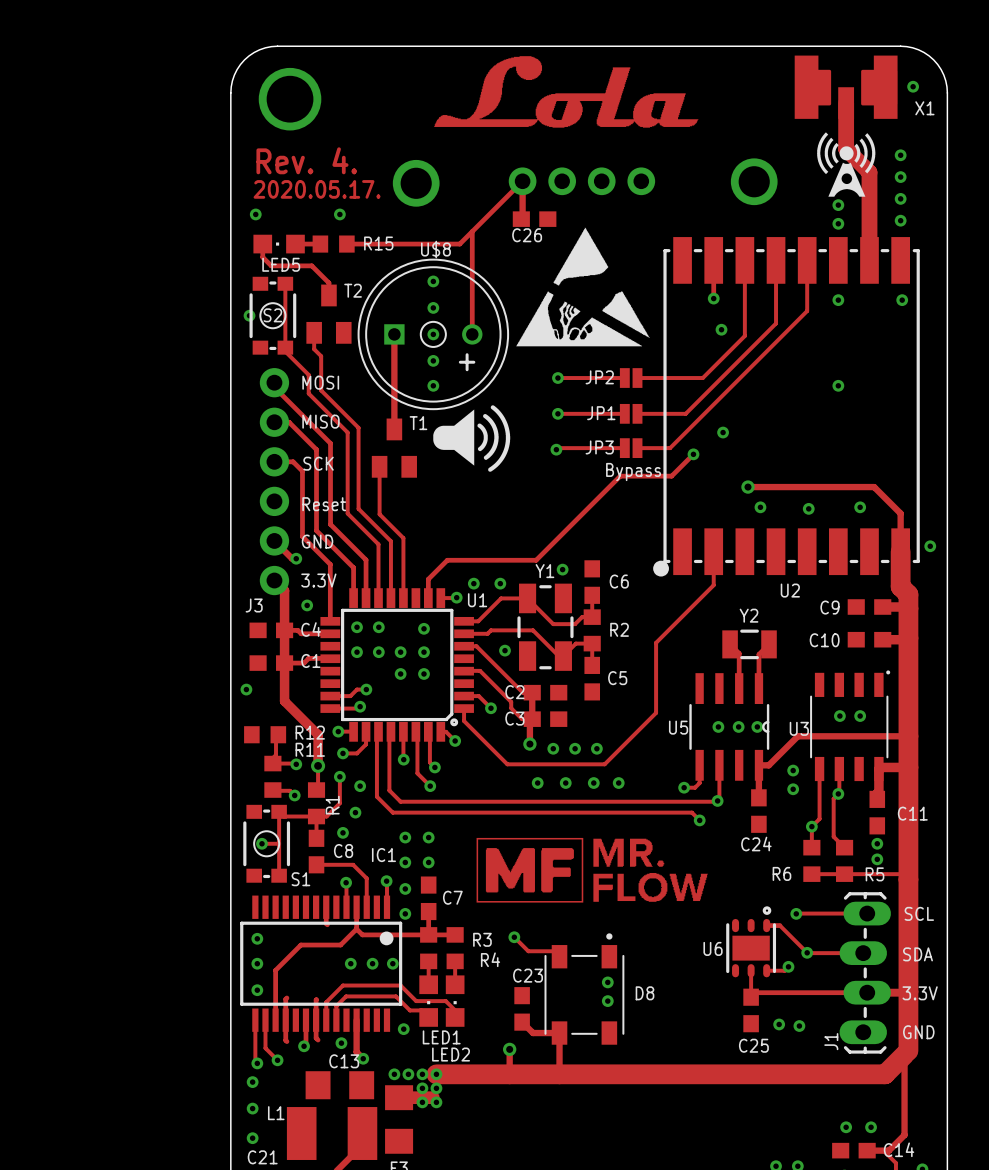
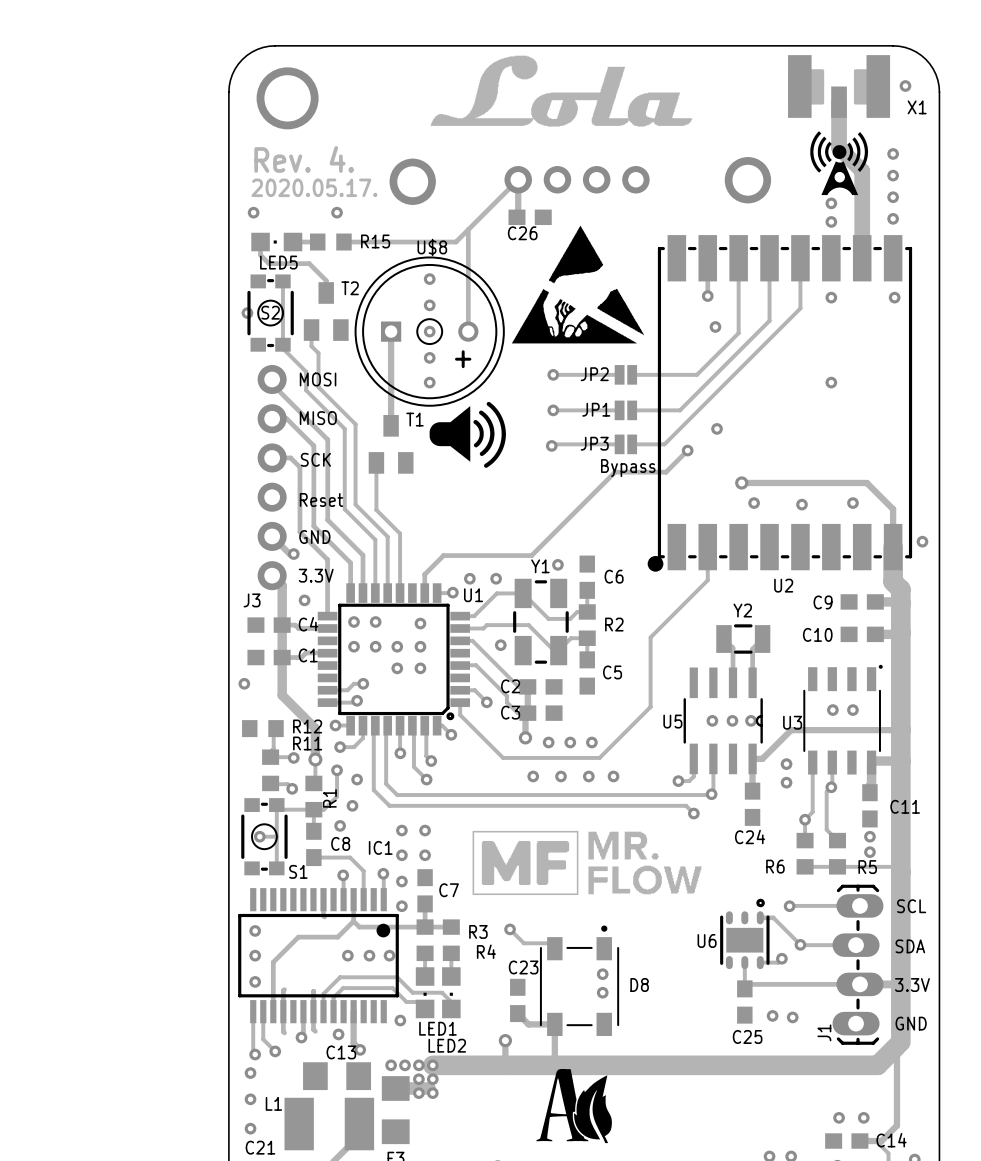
drawing: none -> [536, 1069, 612, 1144]

